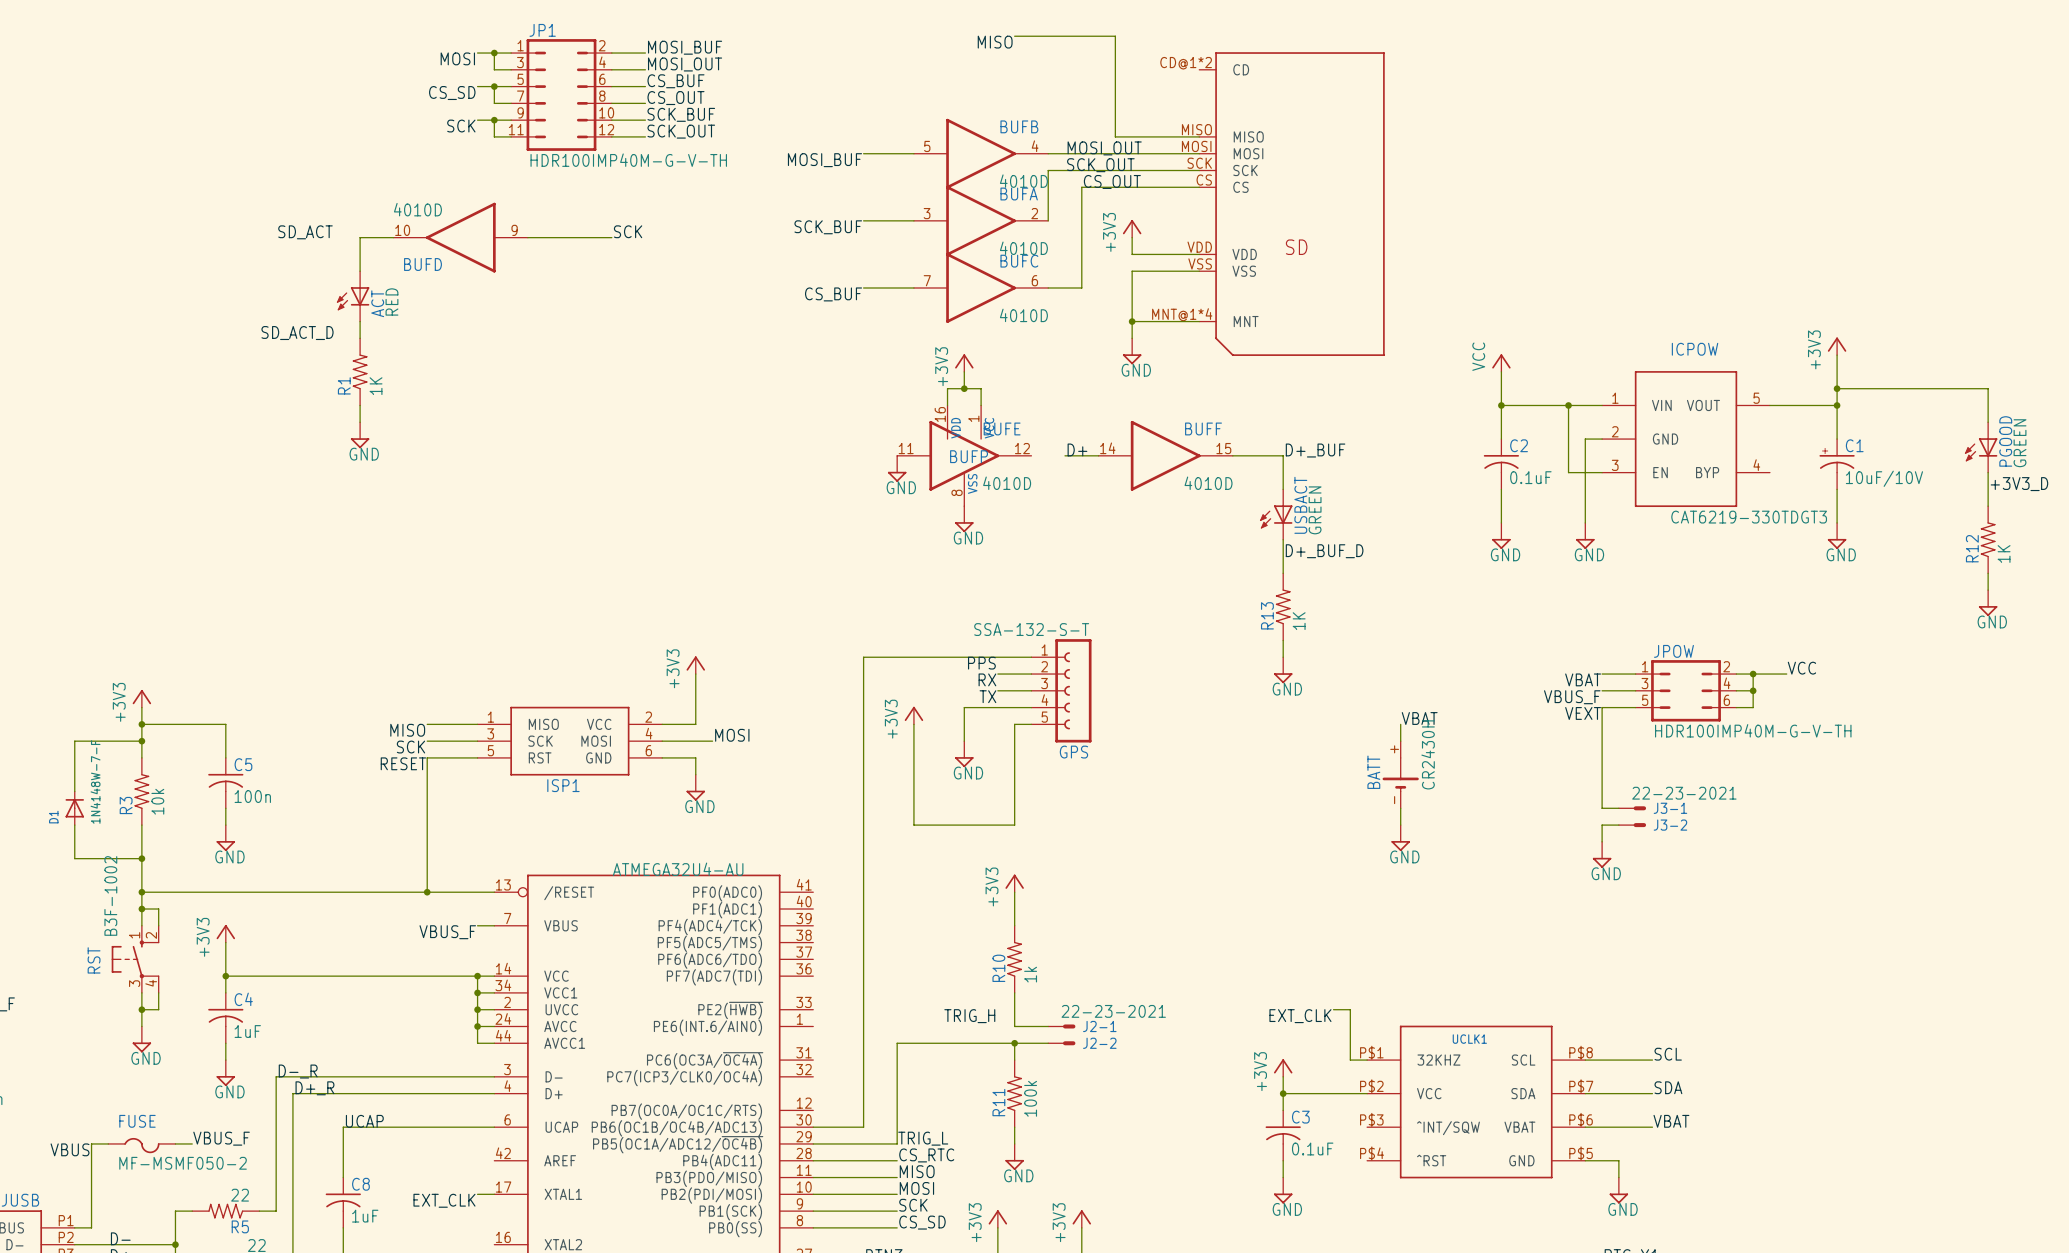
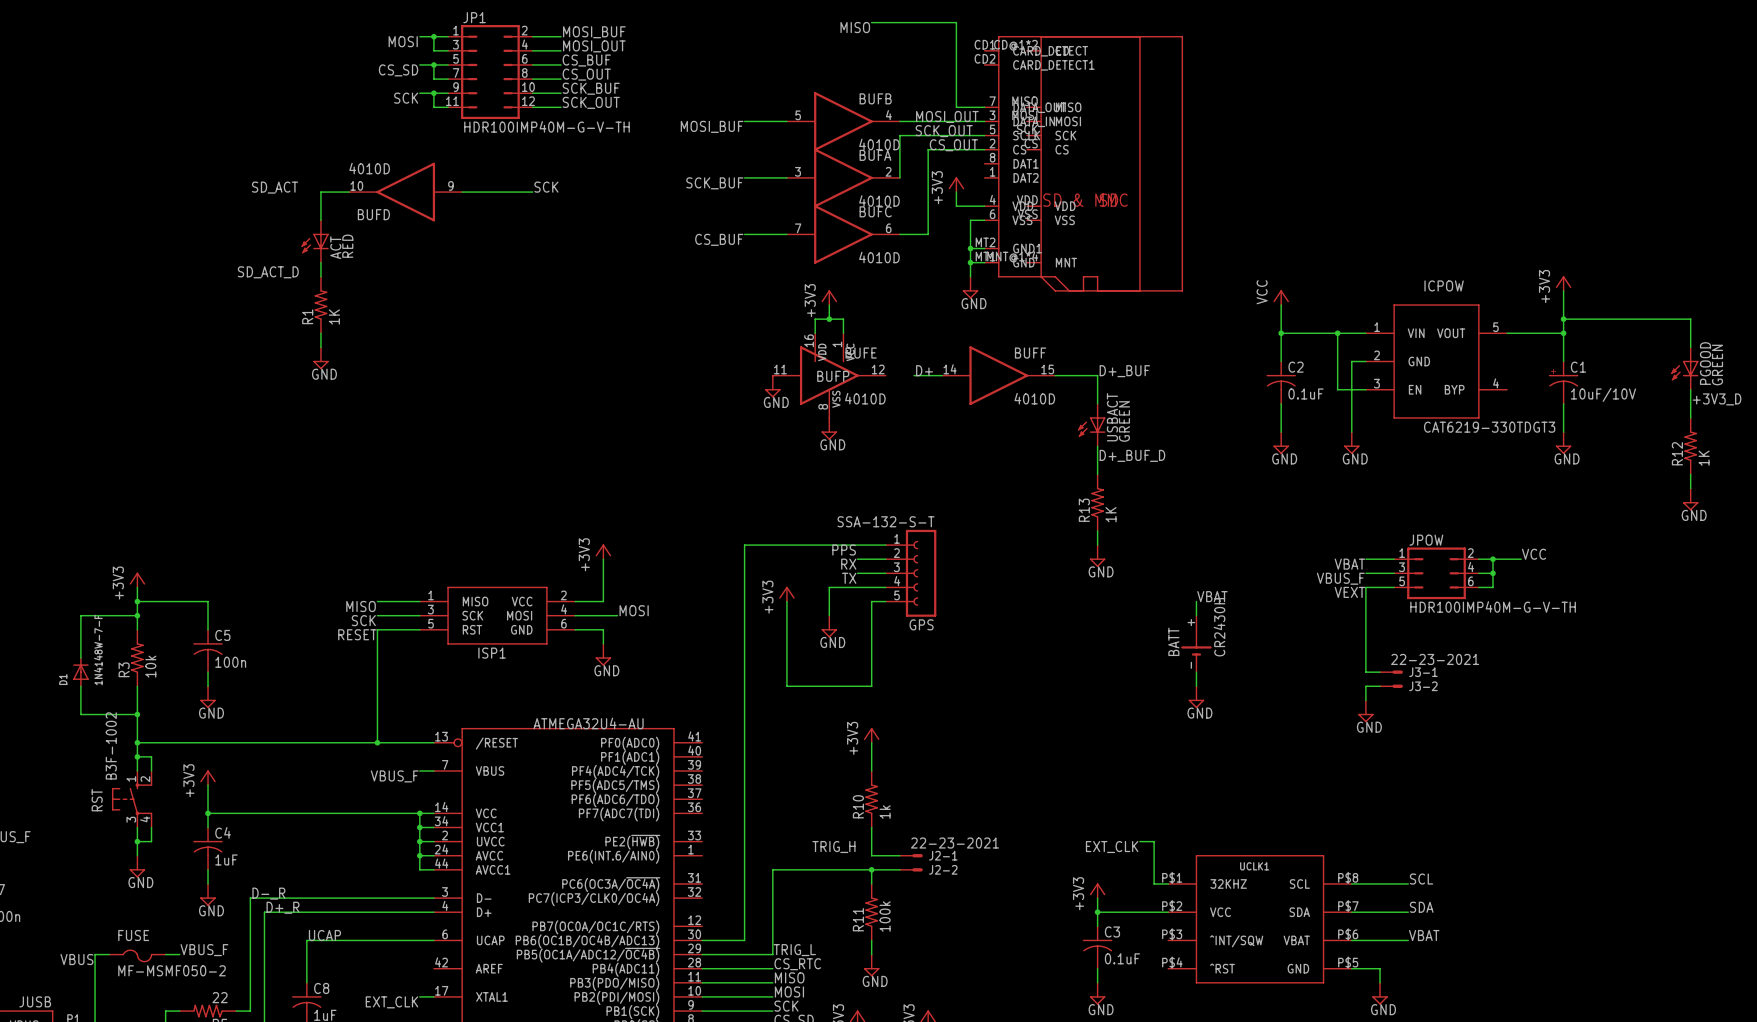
wire: (1148, 136) (1199, 136) -> none
wire: (1148, 153) (1199, 153) -> none
wire: (1148, 170) (1199, 170) -> none
wire: (1148, 187) (1199, 187) -> none
part: none -> (1062, 163)
power symbol position: +3V3 (1132, 228) -> +3V3 (956, 184)
wire: (1132, 237) (1132, 254) -> (956, 192) (956, 206) (970, 206)
wire: (1148, 254) (1199, 254) -> none
wire: (1148, 271) (1199, 271) -> none
wire: none -> (970, 248) (984, 248)
junction: none -> (970, 248)
wire: (1148, 321) (1199, 321) -> none

